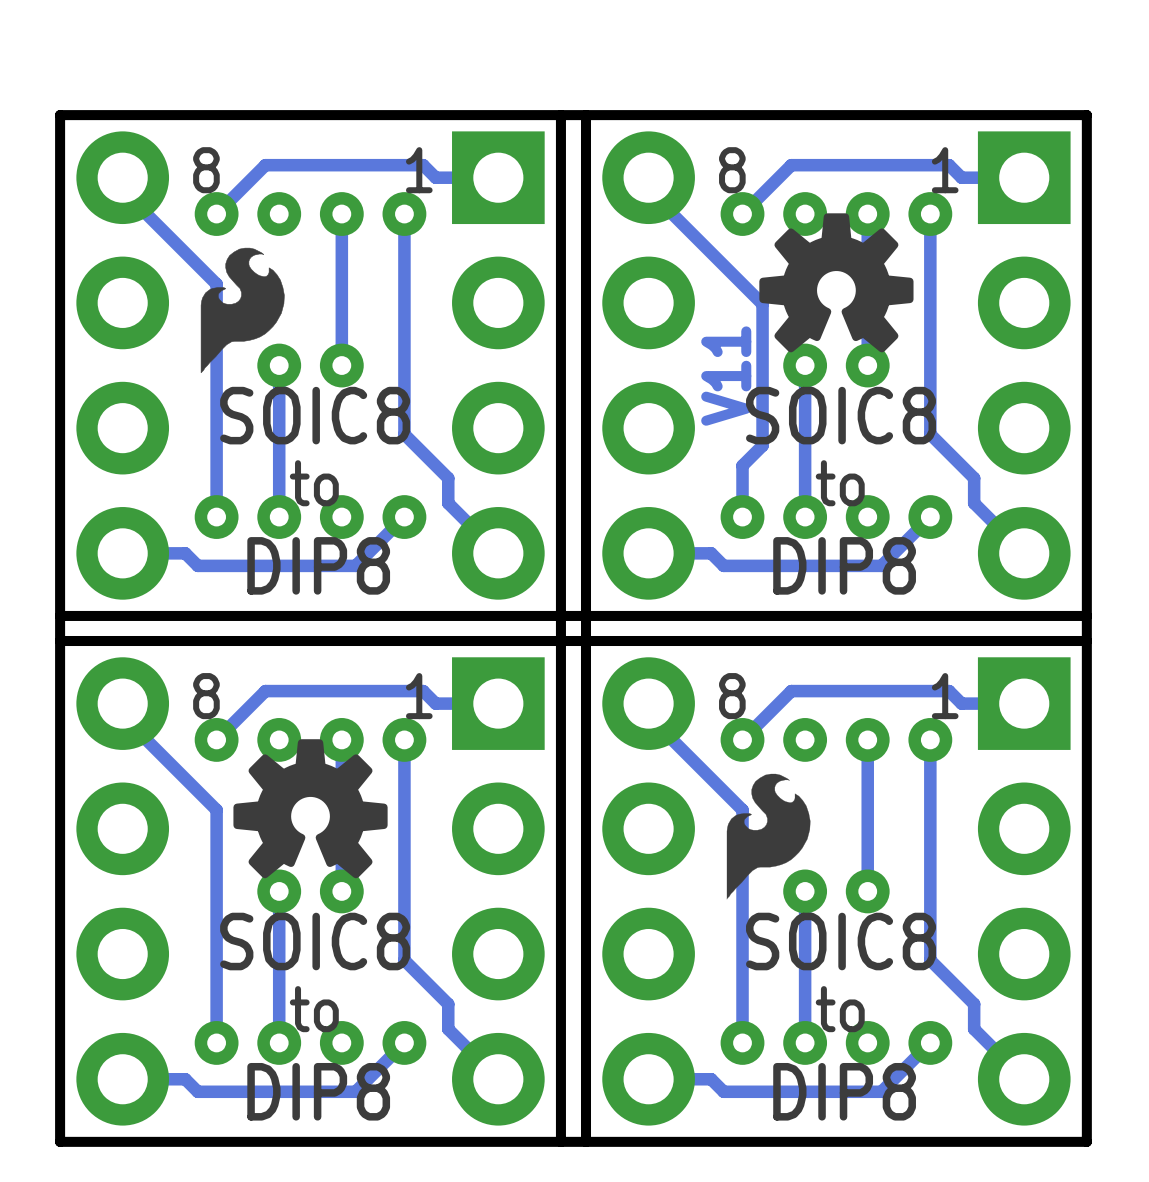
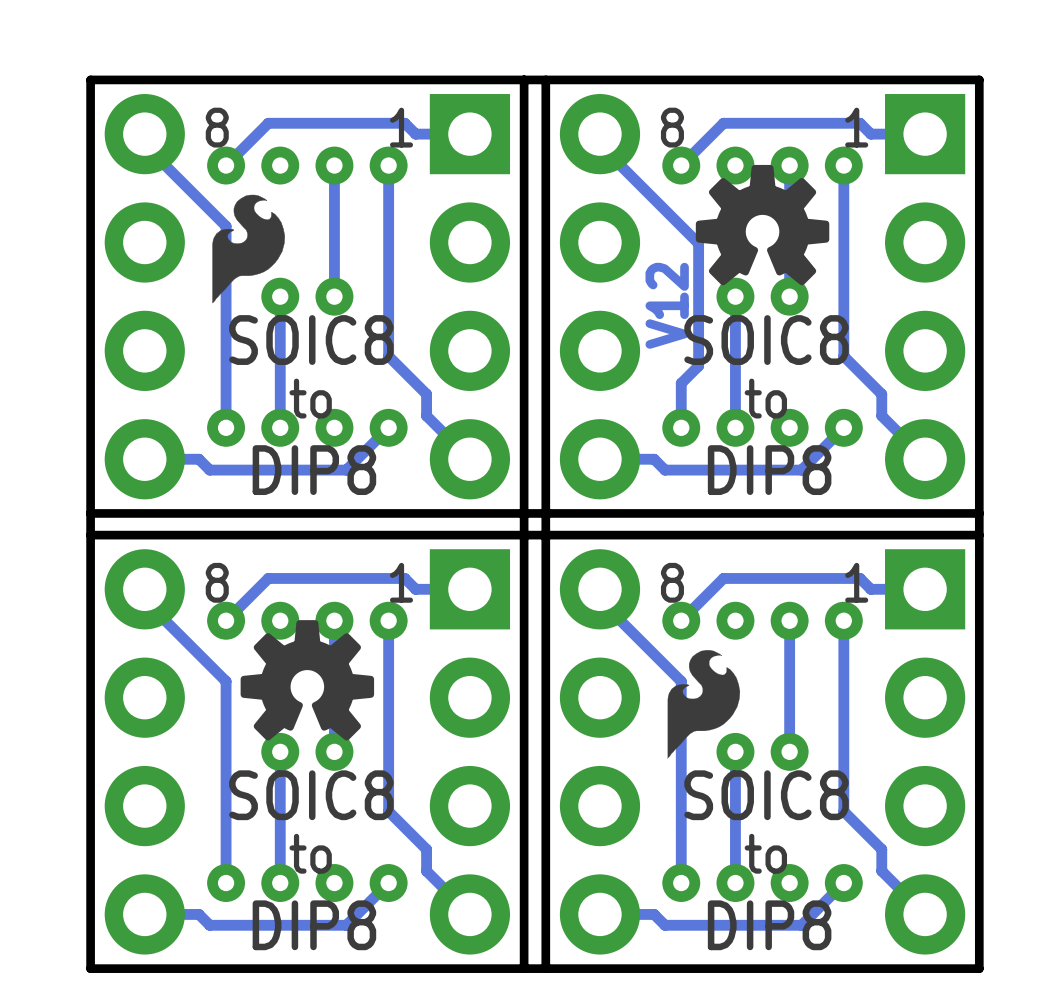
text: V11 (726, 376) -> V12 (667, 305)

